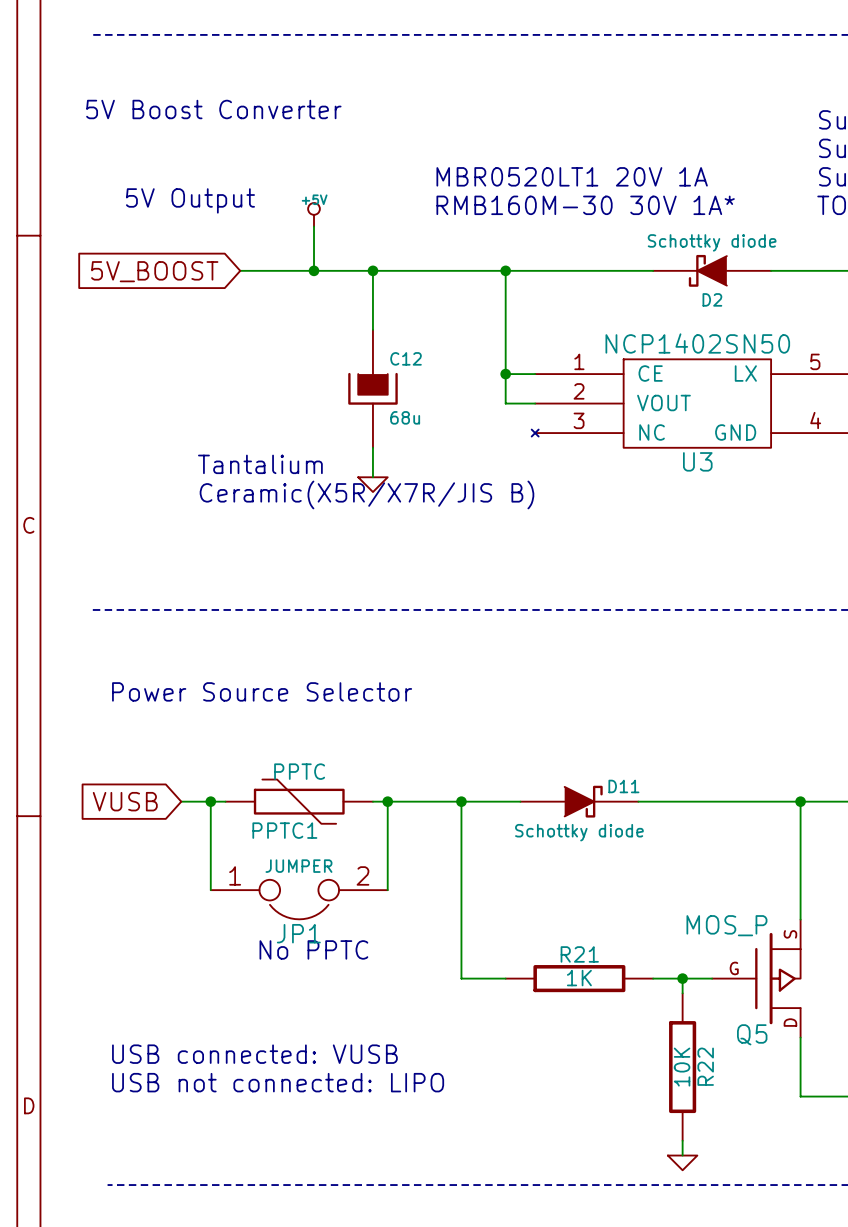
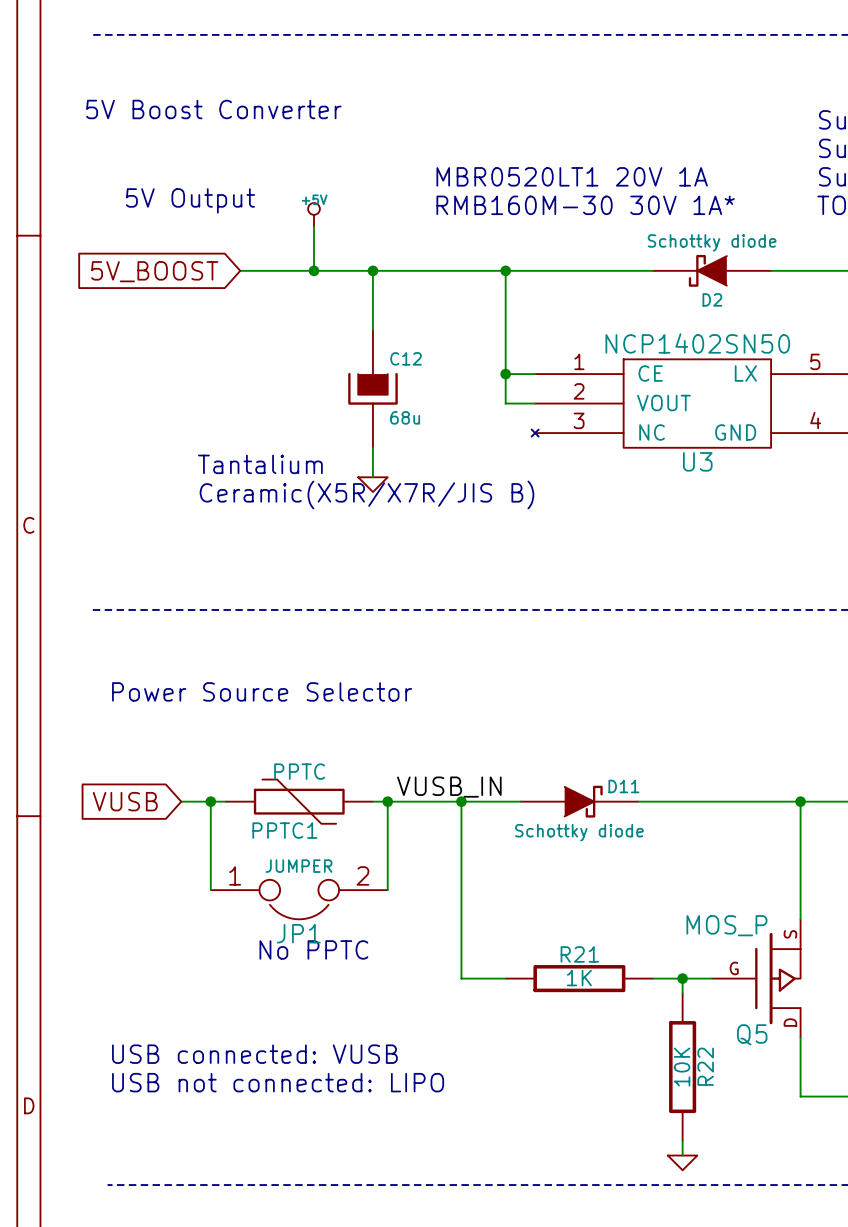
label: none -> VUSB_IN (449, 787)

